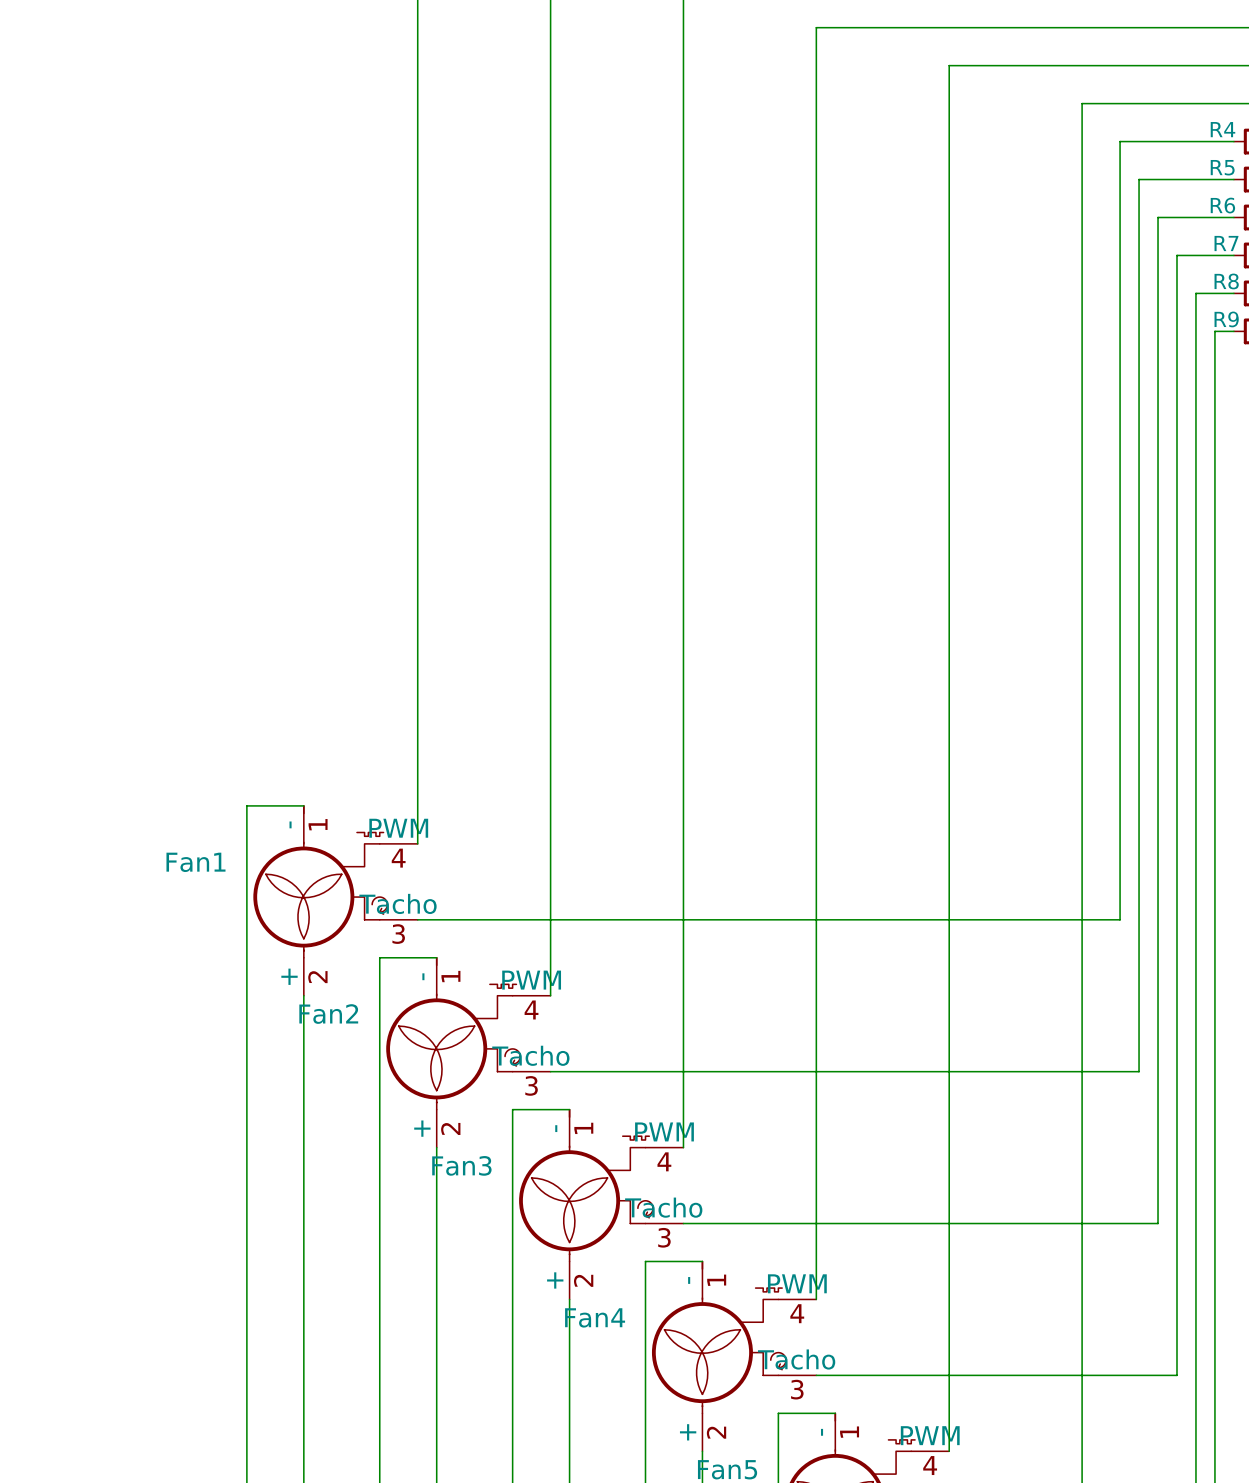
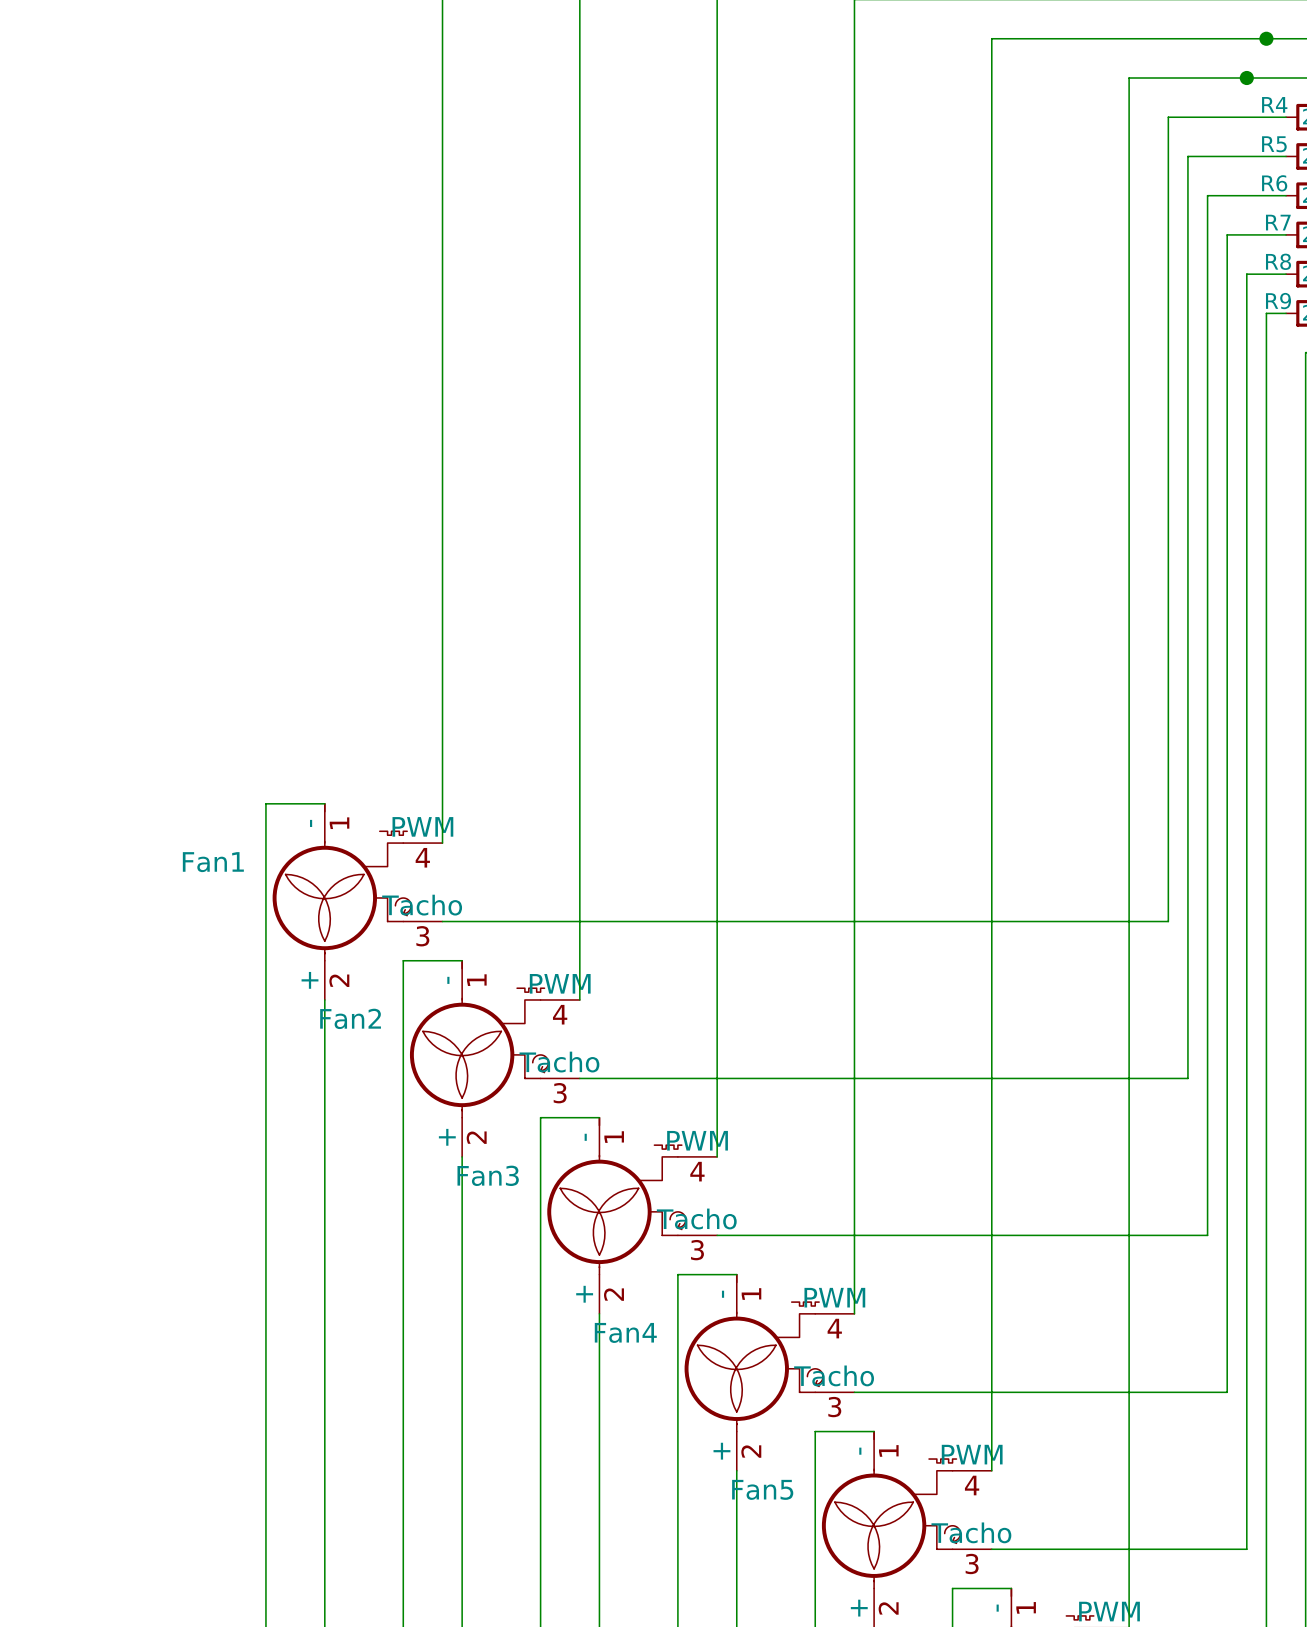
junction: none -> (1266, 38)
junction: none -> (1246, 77)

